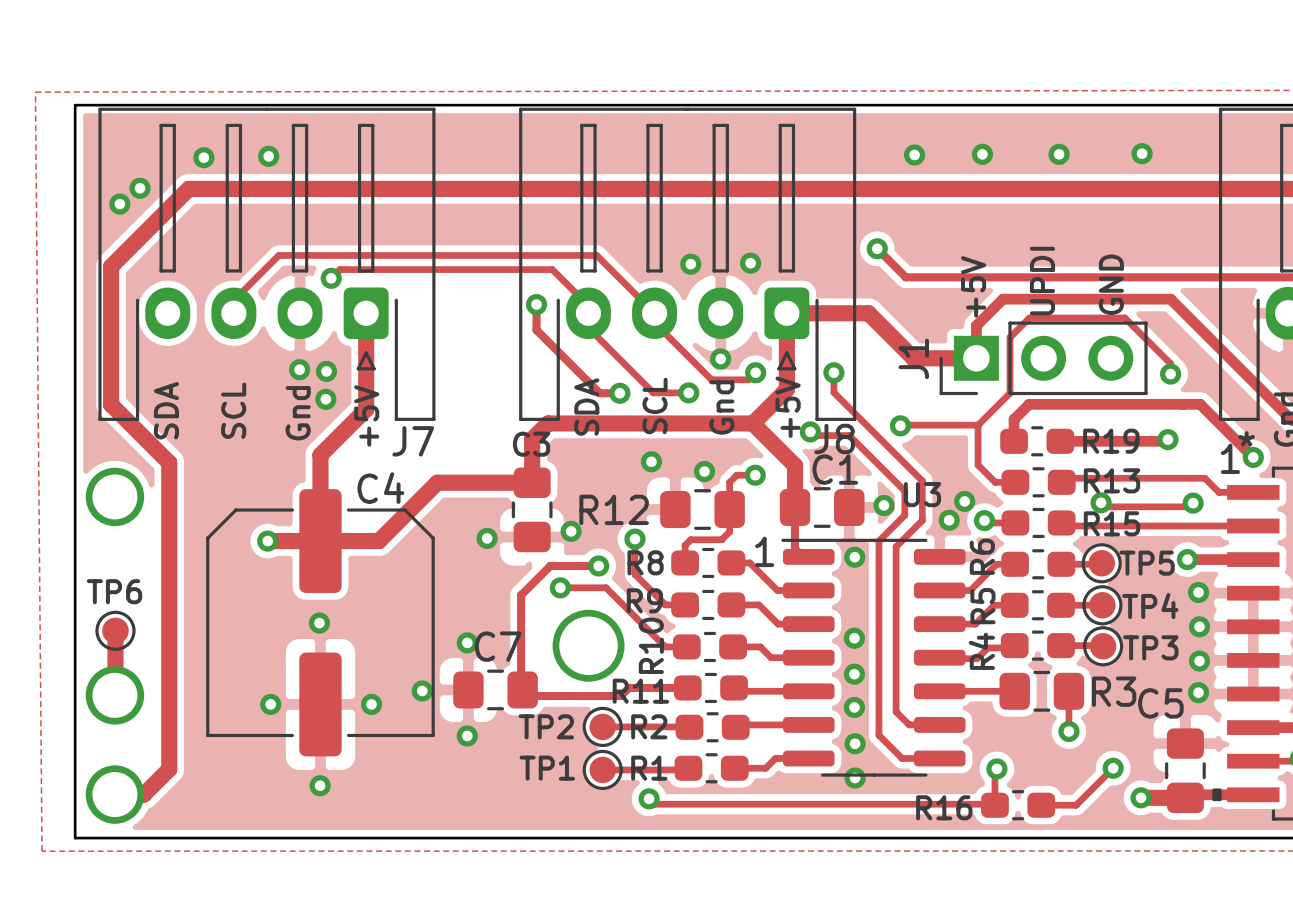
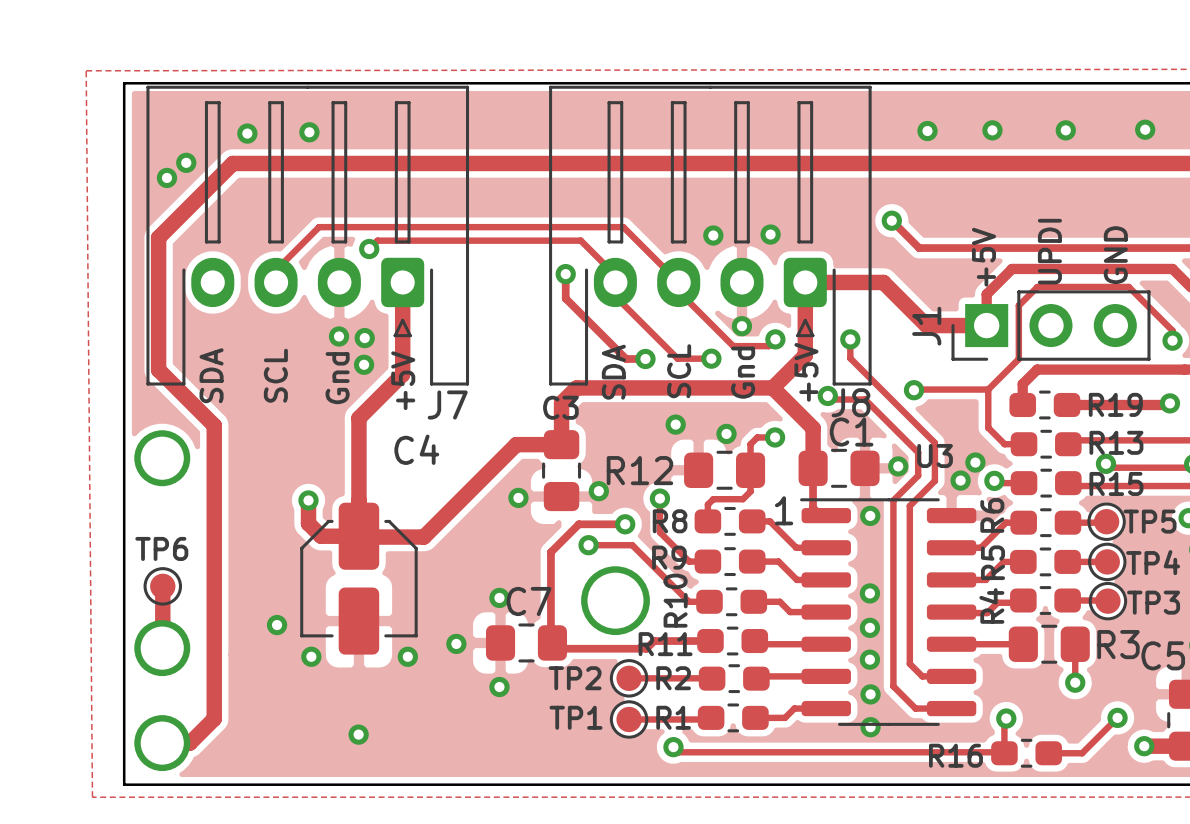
track: (484, 482) (437, 482) (378, 541) (267, 541) -> (516, 444) (423, 537) (358, 536)
C4 footprint: [206, 489, 435, 757] -> [300, 502, 418, 655]
track: none -> (308, 500) (308, 523) (321, 536) (358, 536)
via position: (319, 623) -> (277, 625)

